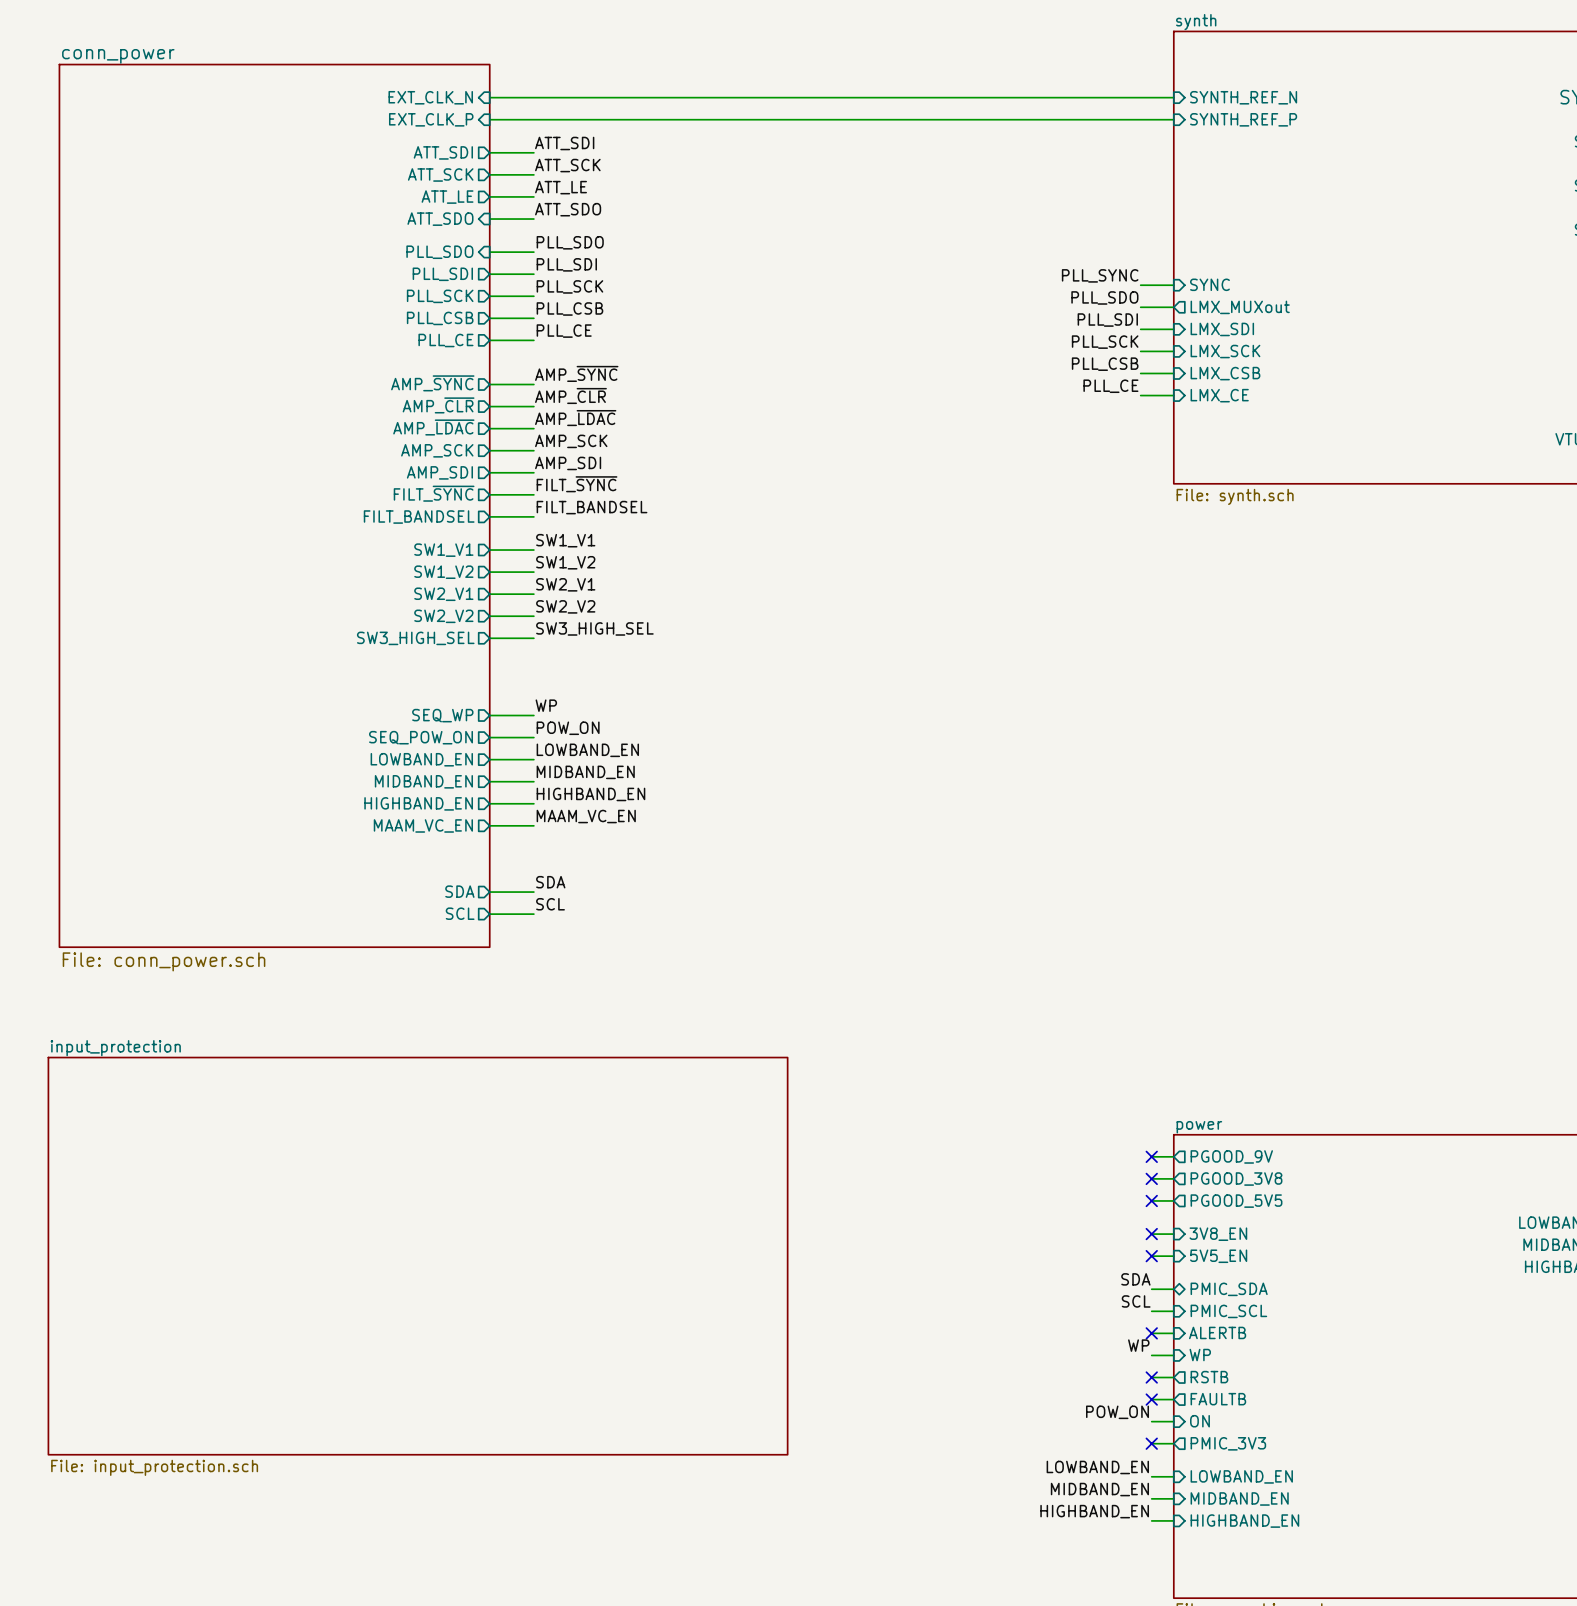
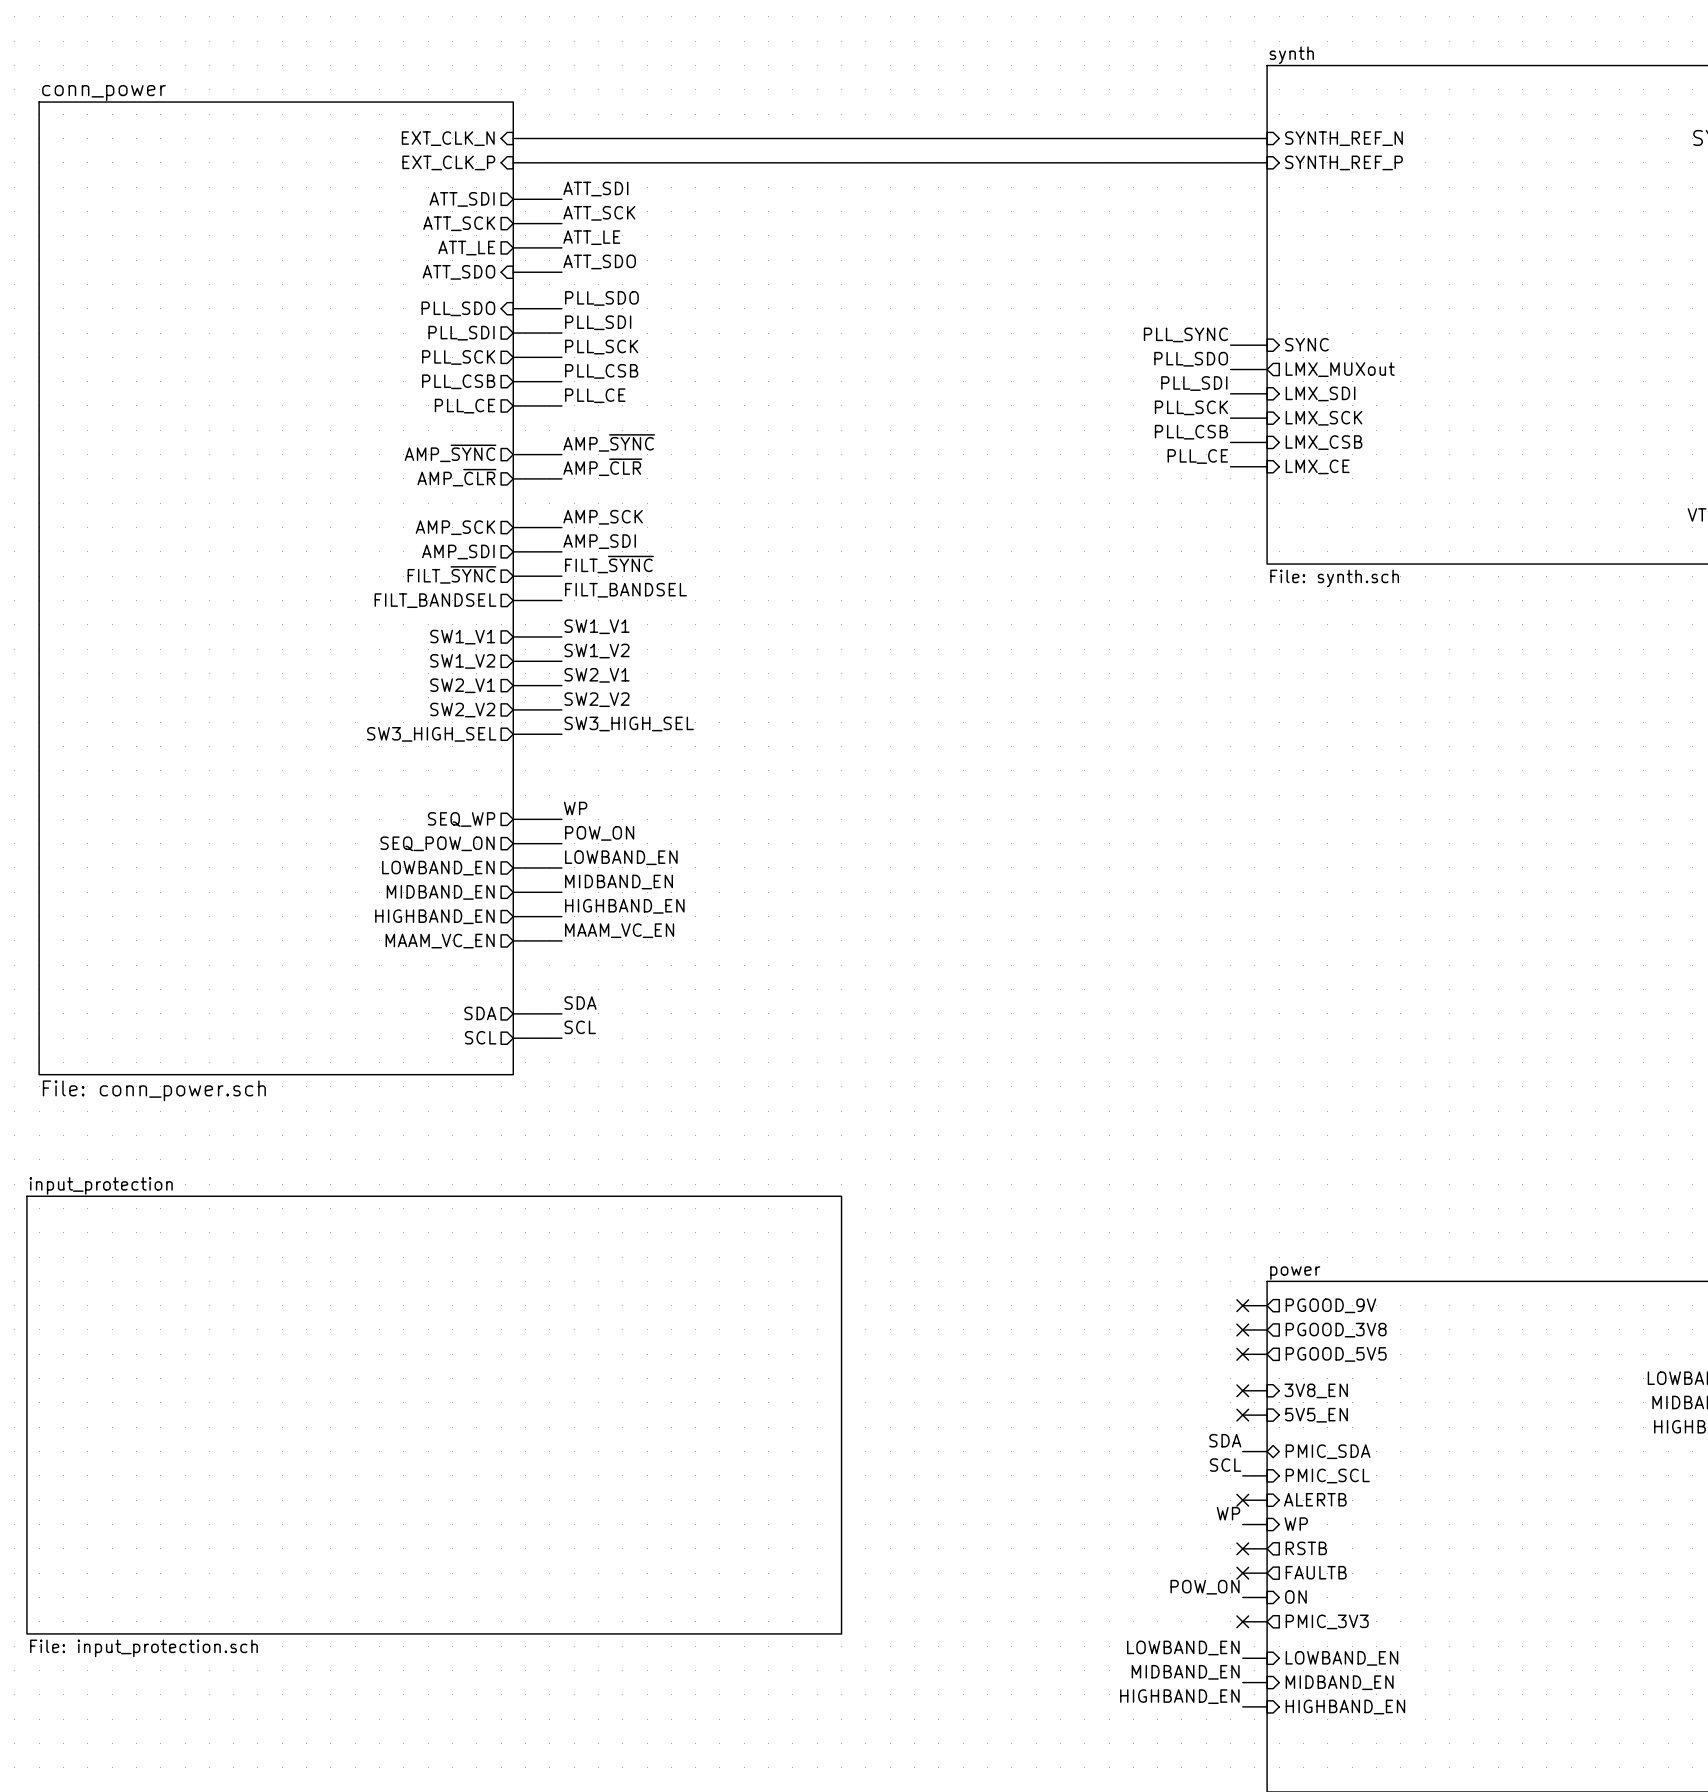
label: AMP_~{LDAC} (575, 418) -> none
sheet pin: AMP_~{LDAC} (433, 427) -> none
wire: (489, 428) (533, 428) -> none

